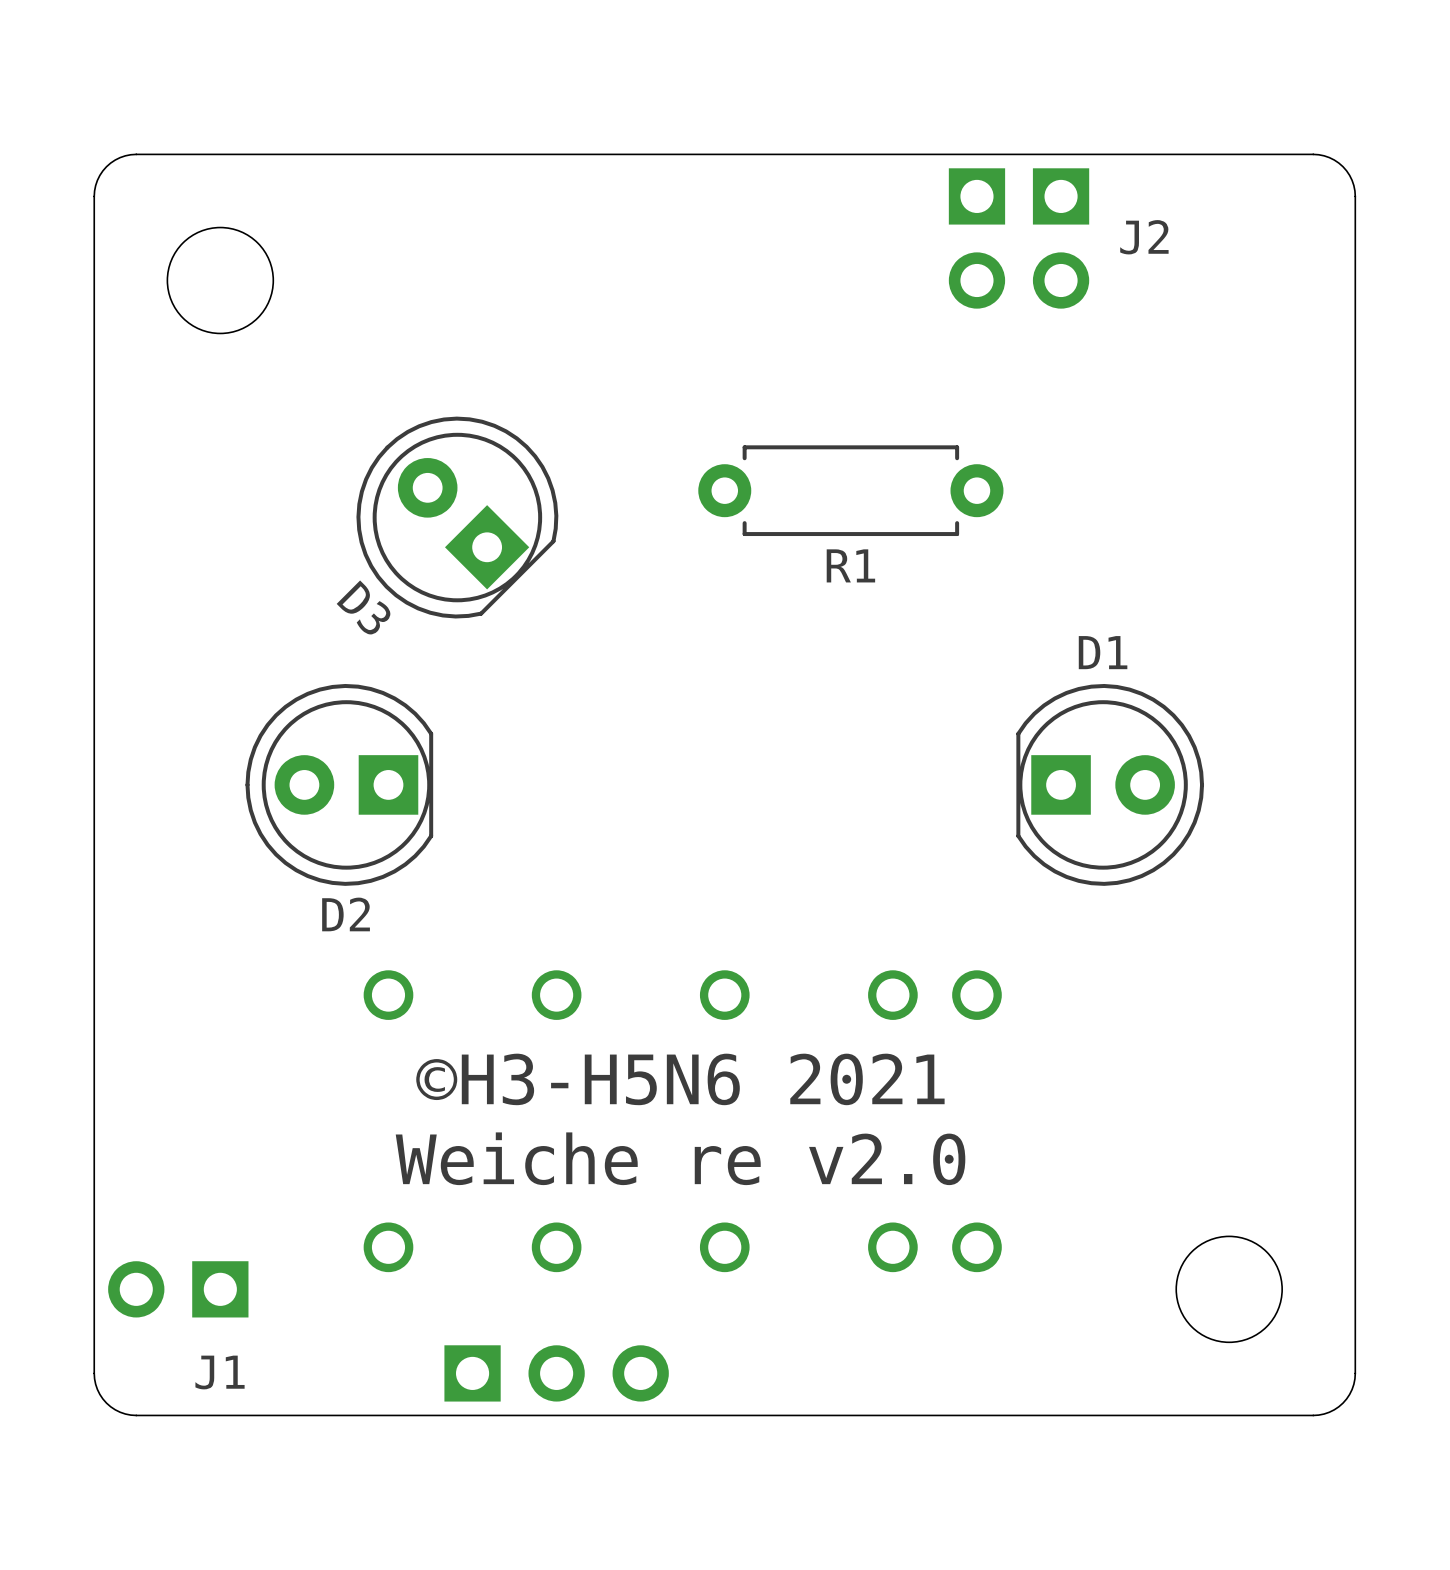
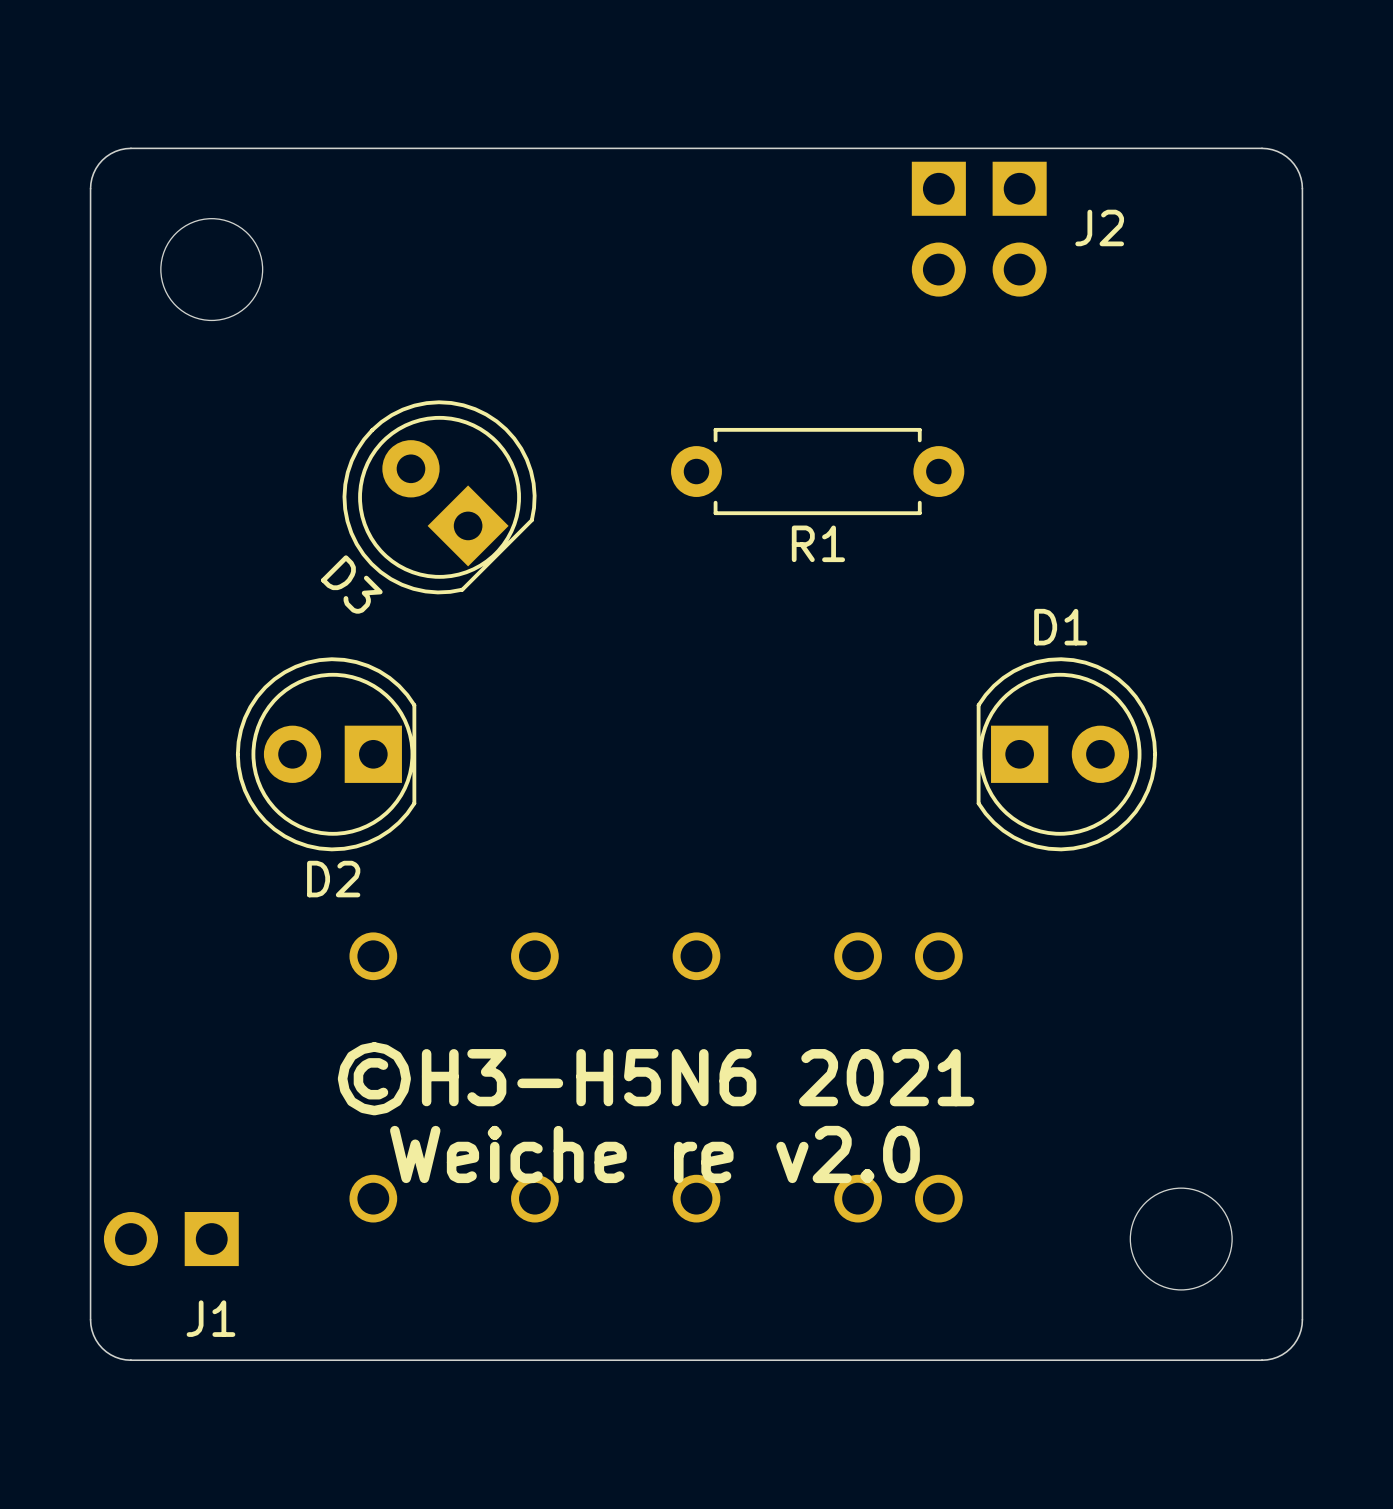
text position: ©H3-H5N6 2021 (680, 1079) -> ©H3-H5N6 2021 (656, 1078)
text position: Weiche re v2.0 (680, 1158) -> Weiche re v2.0 (654, 1154)
part: (556, 1373) -> none

